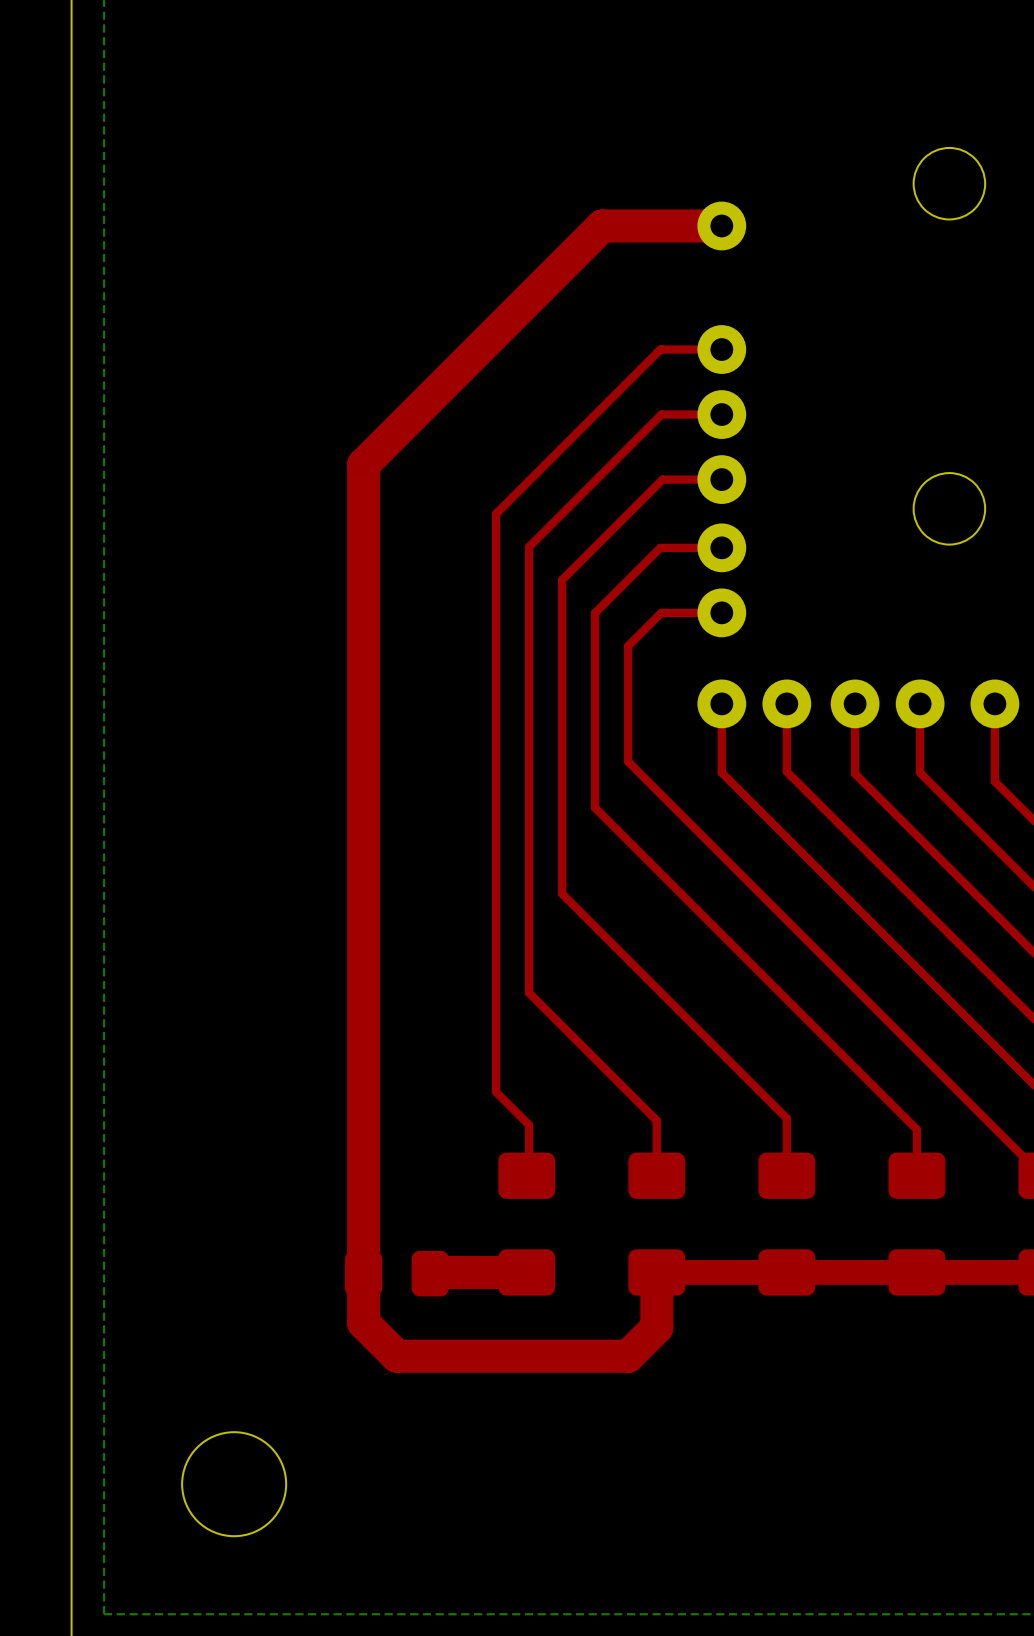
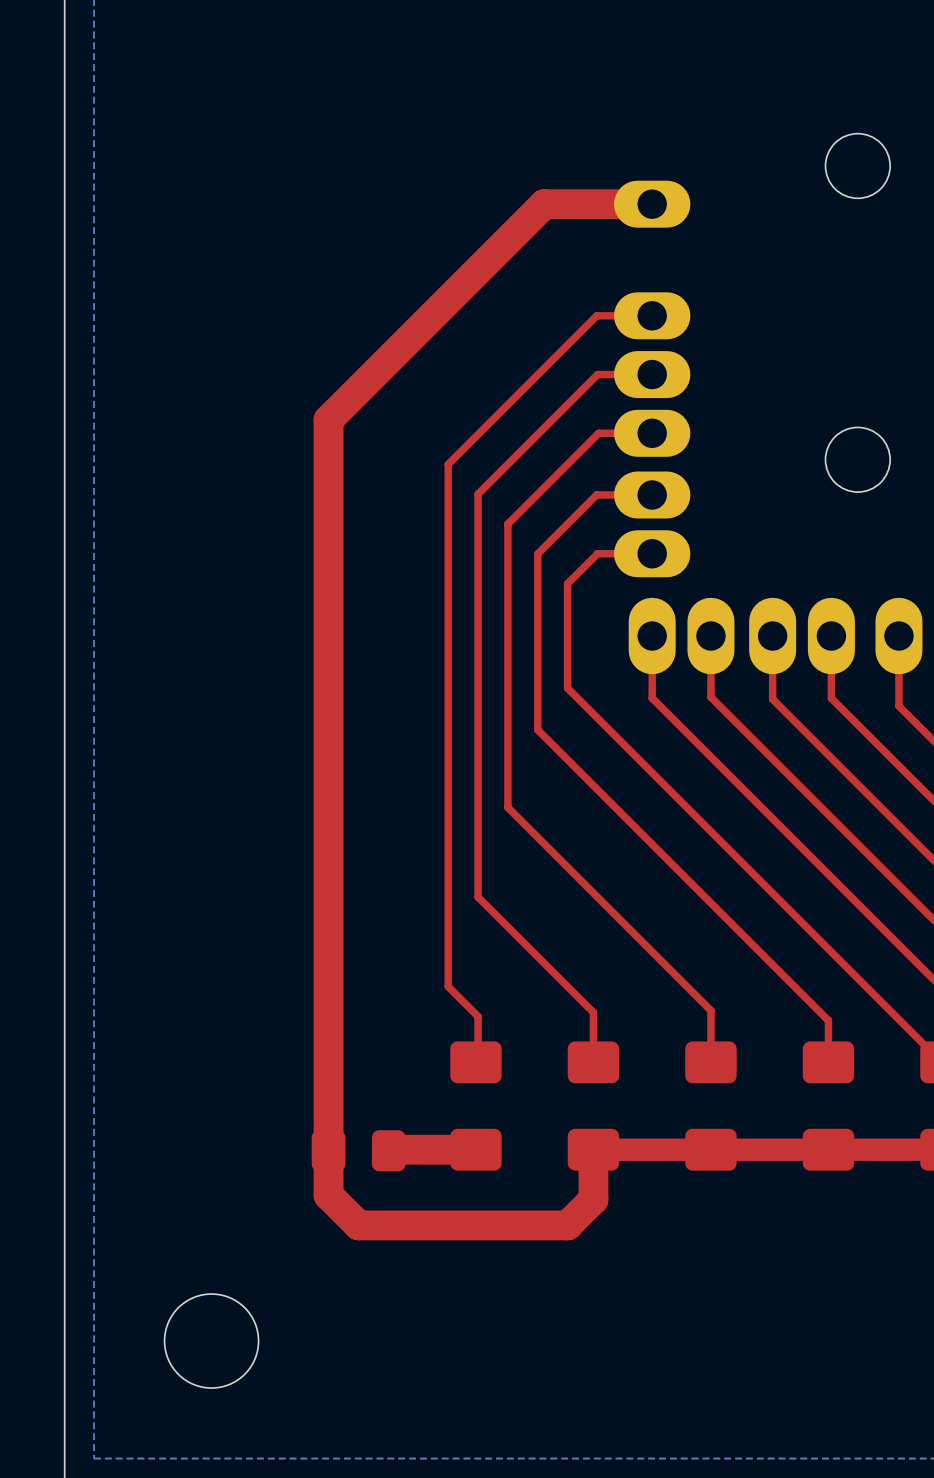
part footprint: [697, 201, 747, 251] -> [614, 180, 691, 228]
part footprint: [697, 325, 747, 374] -> [614, 292, 691, 340]
part footprint: [697, 390, 747, 439] -> [614, 351, 691, 399]
part footprint: [697, 455, 747, 504] -> [614, 409, 691, 457]
part footprint: [697, 523, 747, 573] -> [614, 471, 691, 519]
part footprint: [697, 588, 747, 638] -> [614, 530, 691, 578]
part footprint: [697, 679, 747, 729] -> [628, 597, 676, 675]
part footprint: [762, 679, 812, 729] -> [687, 597, 735, 675]
part footprint: [830, 679, 880, 729] -> [749, 597, 797, 675]
part footprint: [895, 679, 945, 729] -> [807, 597, 855, 675]
part footprint: [970, 679, 1020, 729] -> [875, 597, 923, 675]

